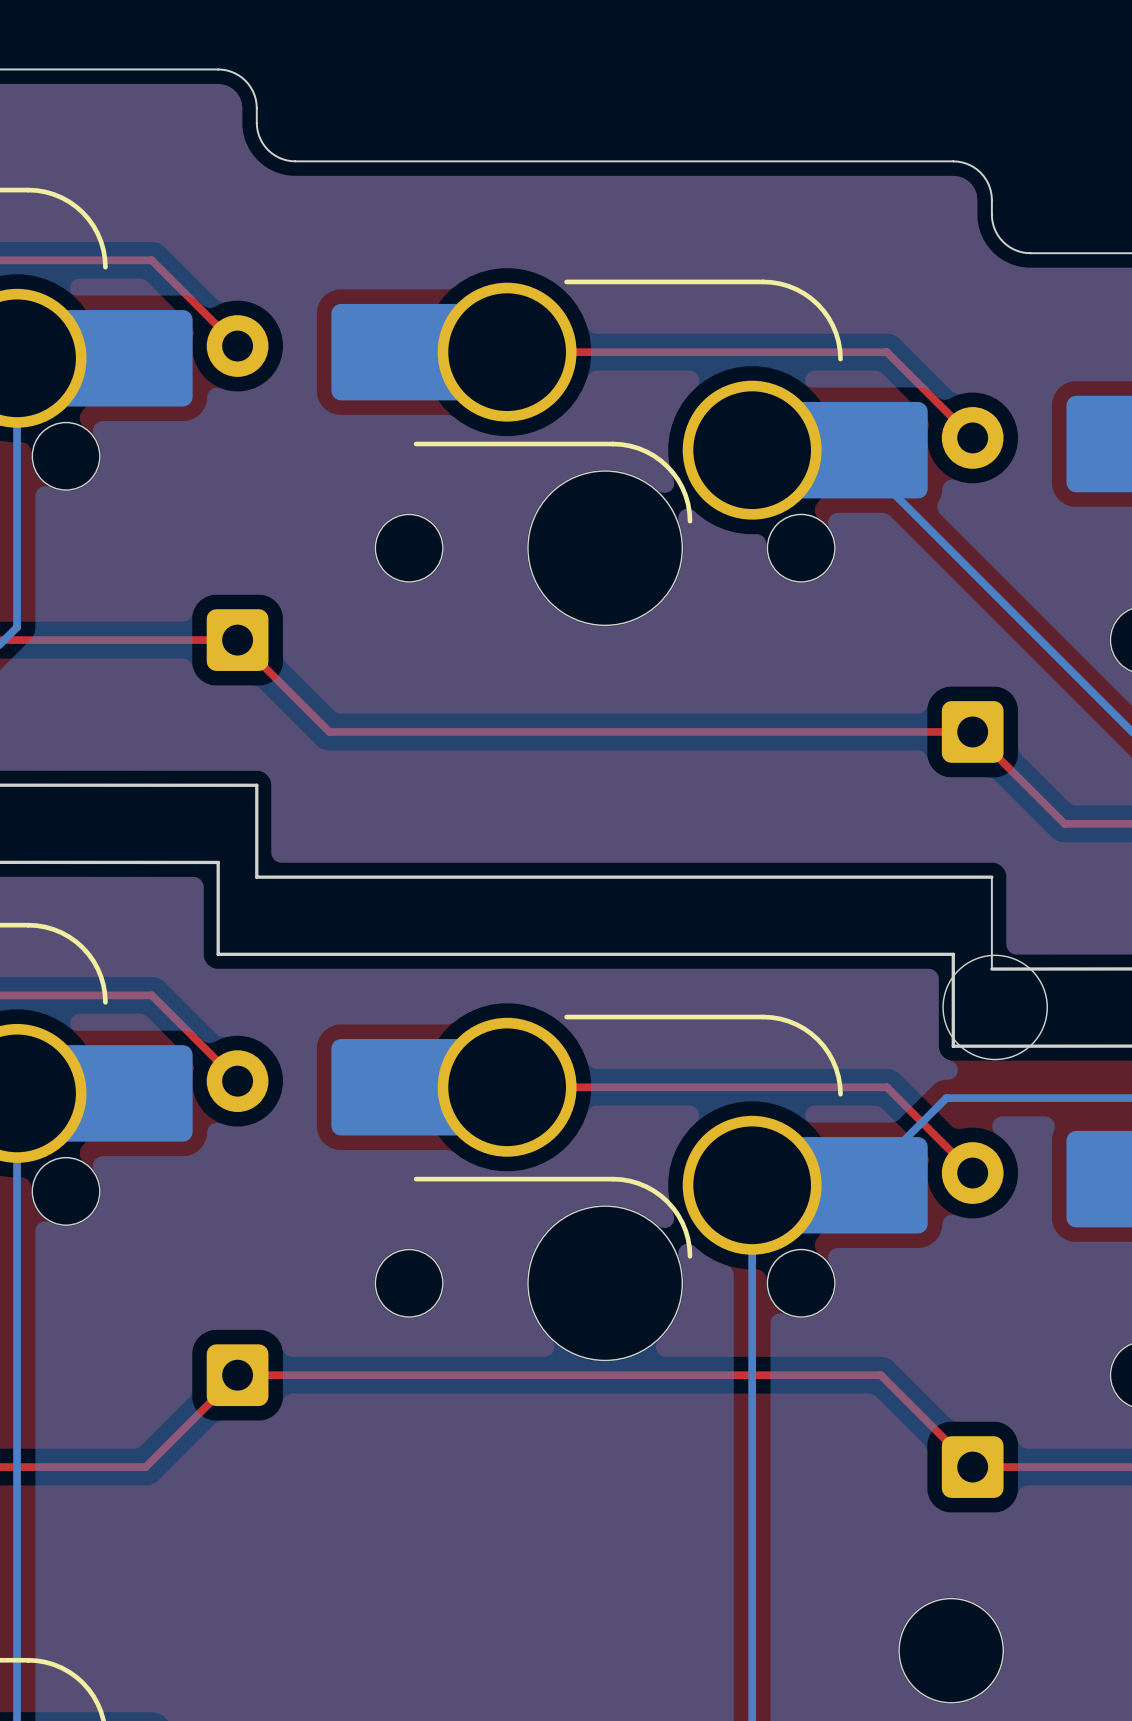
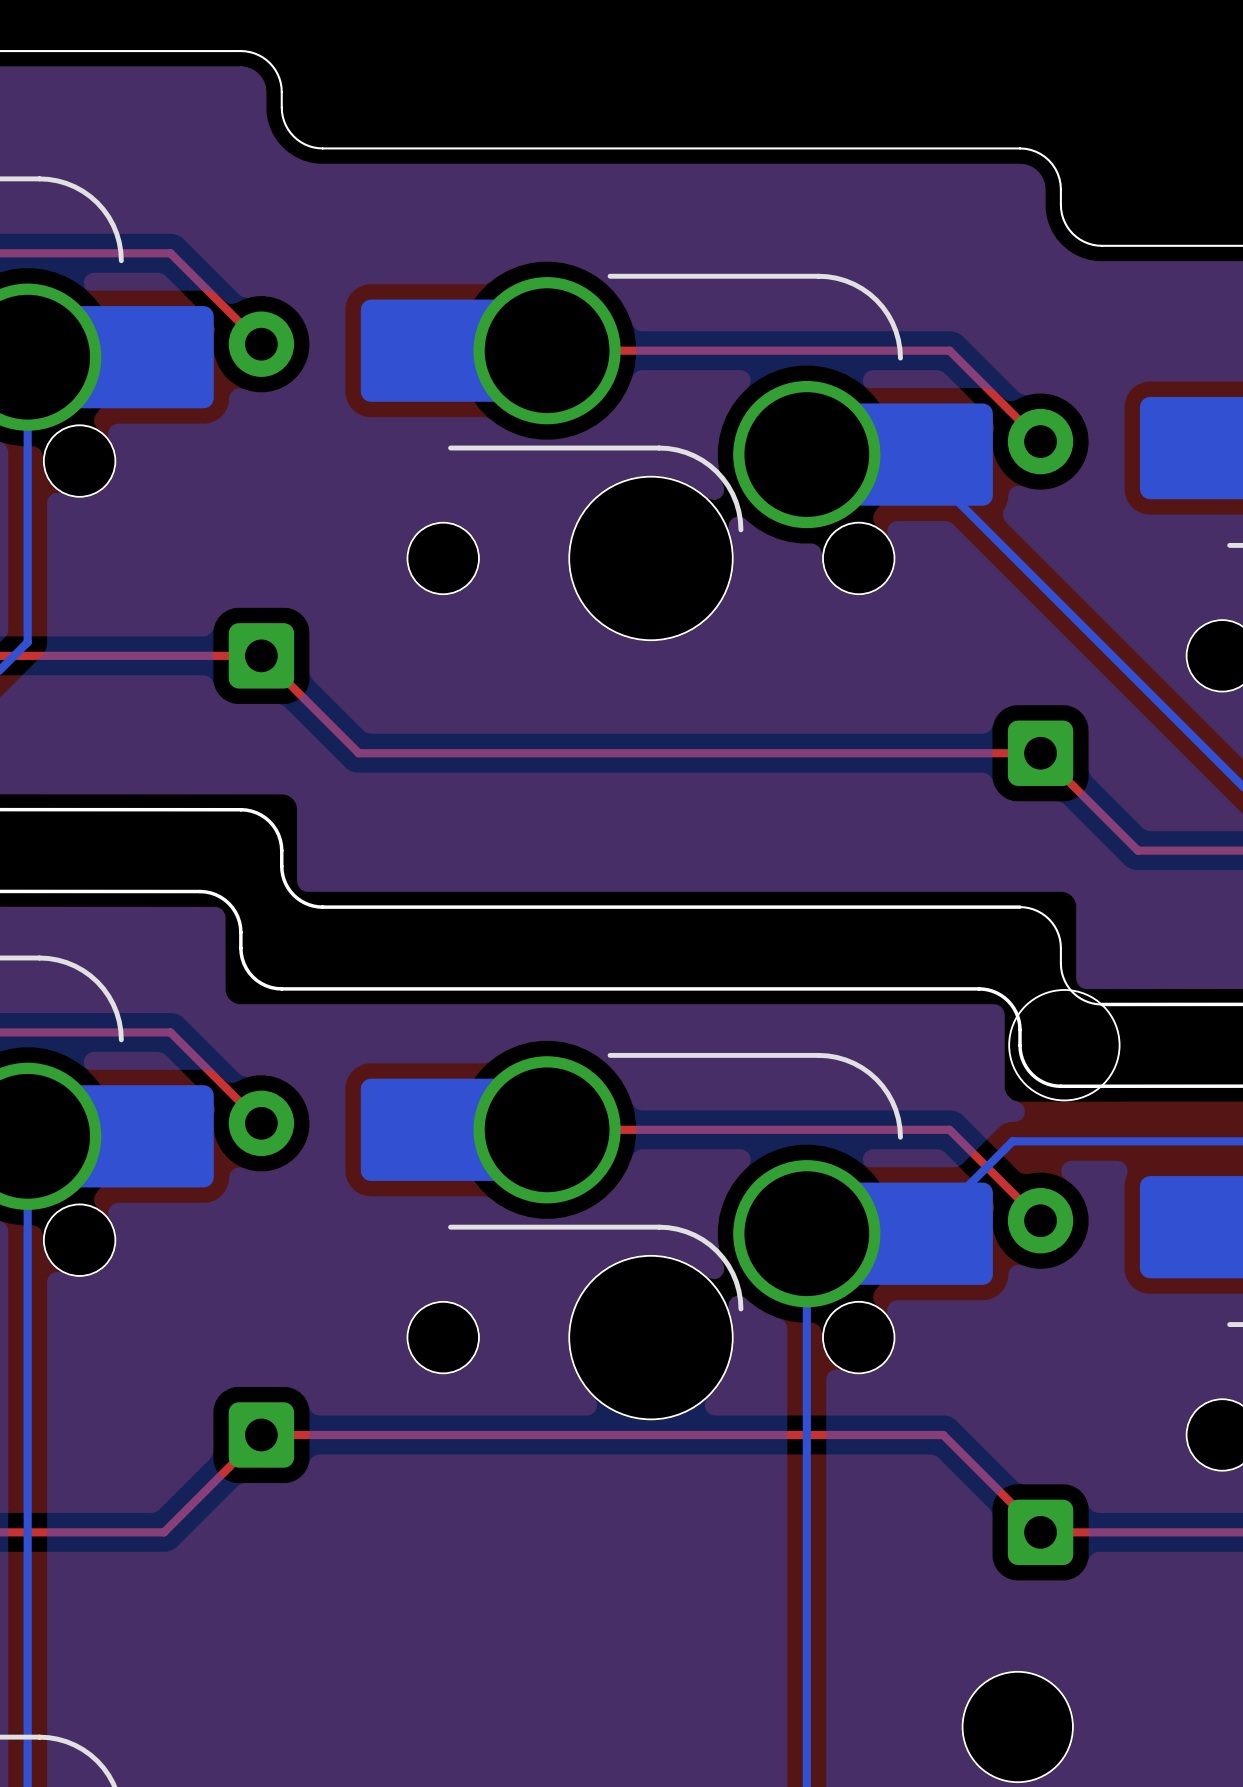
board edge: (218, 785) (256, 785) (256, 823) -> (240, 809) (256, 812) (269, 821) (278, 834) (281, 850)
board edge: (256, 838) (256, 877) (295, 877) -> (281, 866) (284, 879) (293, 895) (309, 904) (322, 907)
board edge: (179, 862) (218, 862) (218, 901) -> (199, 891) (215, 894) (228, 903) (237, 916) (240, 932)
board edge: (953, 877) (991, 877) (991, 915) -> (1019, 907) (1037, 911) (1048, 919) (1058, 934) (1060, 948)
board edge: (218, 915) (218, 954) (256, 954) -> (240, 948) (243, 963) (252, 976) (266, 985) (281, 988)
board edge: (991, 930) (991, 969) (1030, 969) -> (1060, 963) (1063, 977) (1072, 992) (1088, 1002) (1101, 1004)
board edge: (914, 954) (953, 954) (953, 992) -> (979, 988) (992, 991) (1008, 1000) (1017, 1016) (1019, 1029)
board edge: (953, 1007) (953, 1046) (991, 1046) -> (1019, 1045) (1022, 1058) (1031, 1074) (1047, 1083) (1060, 1086)

